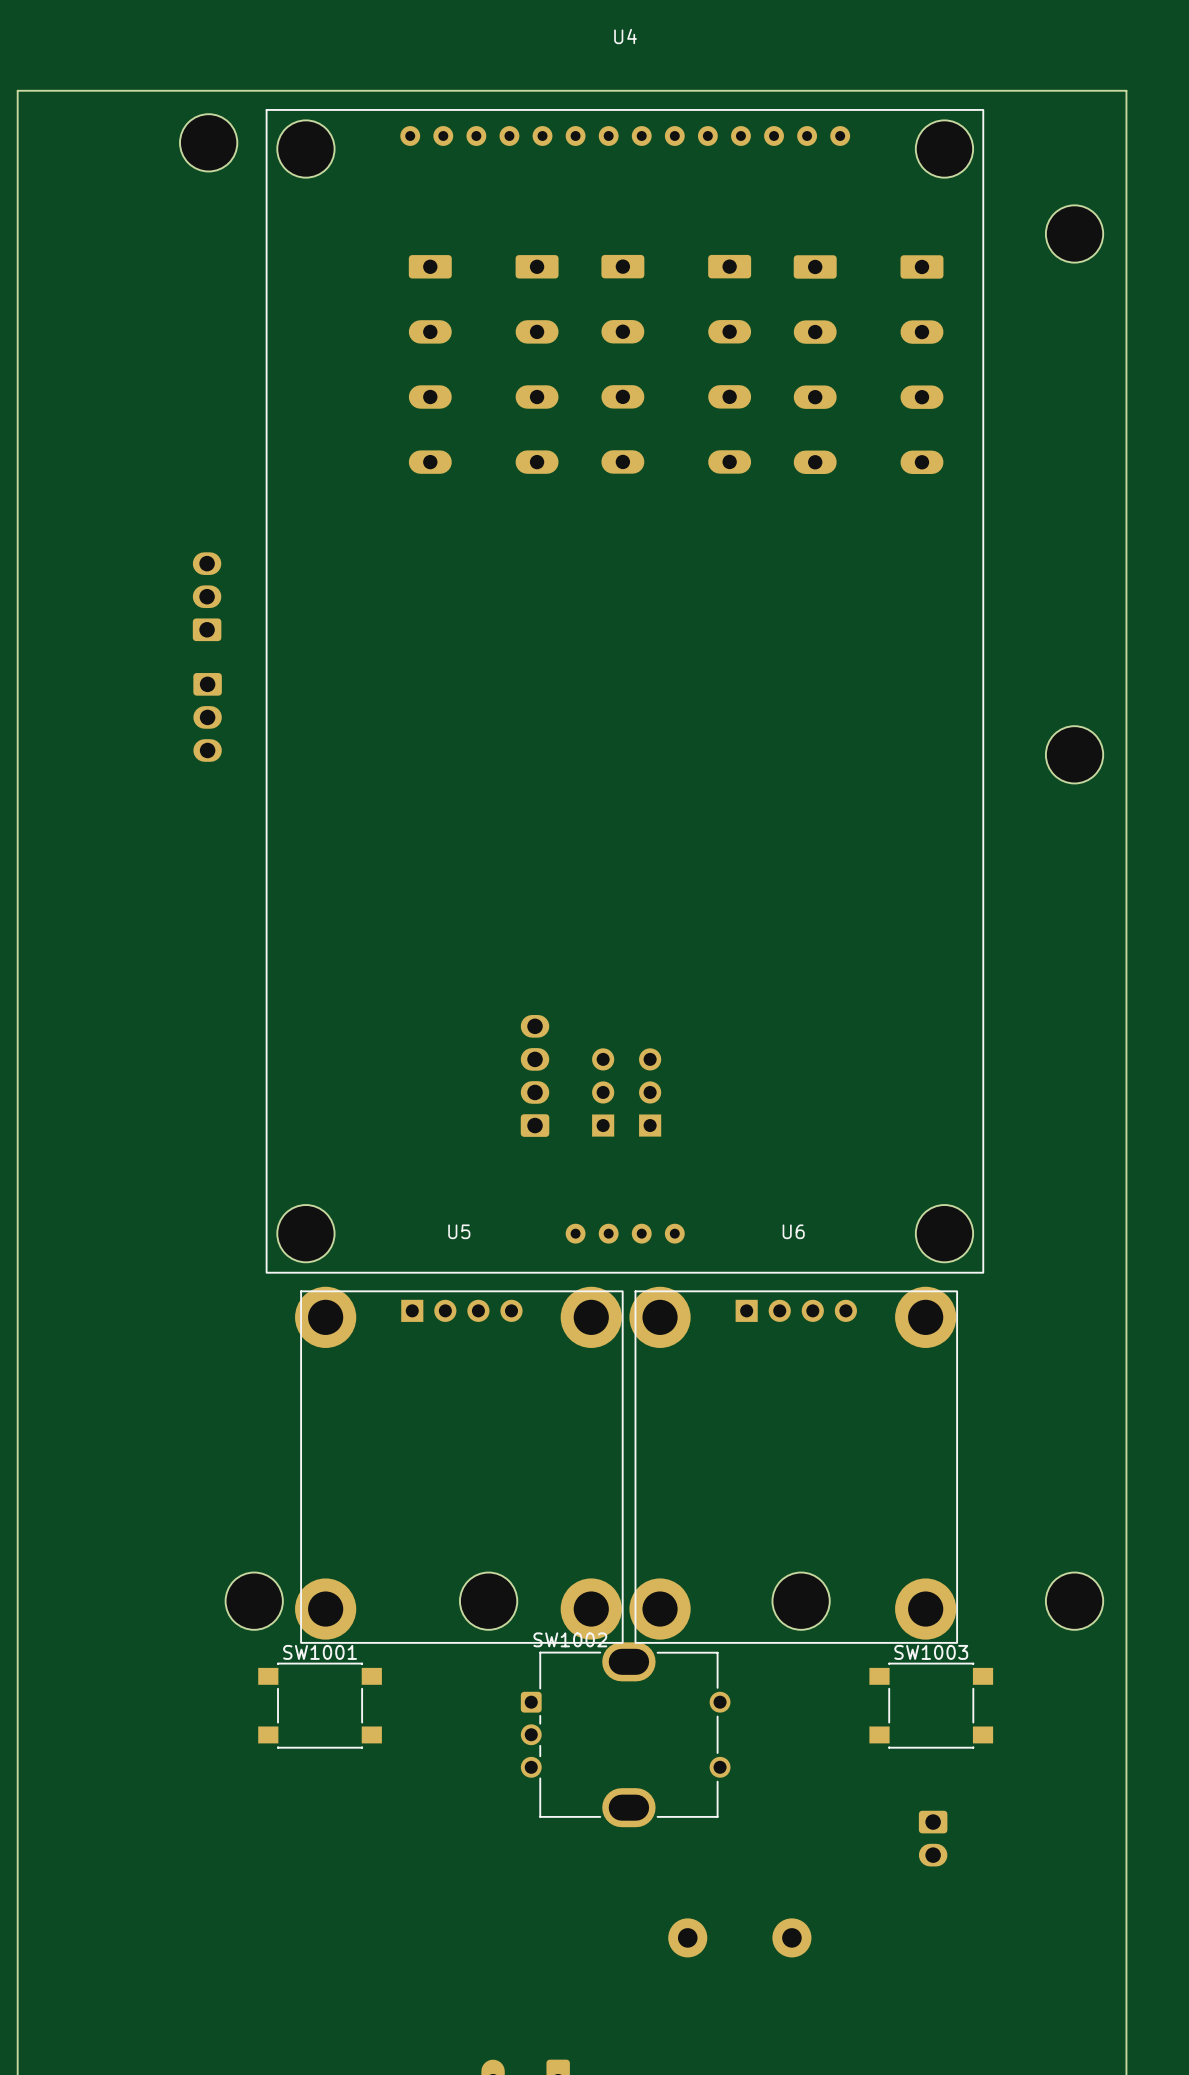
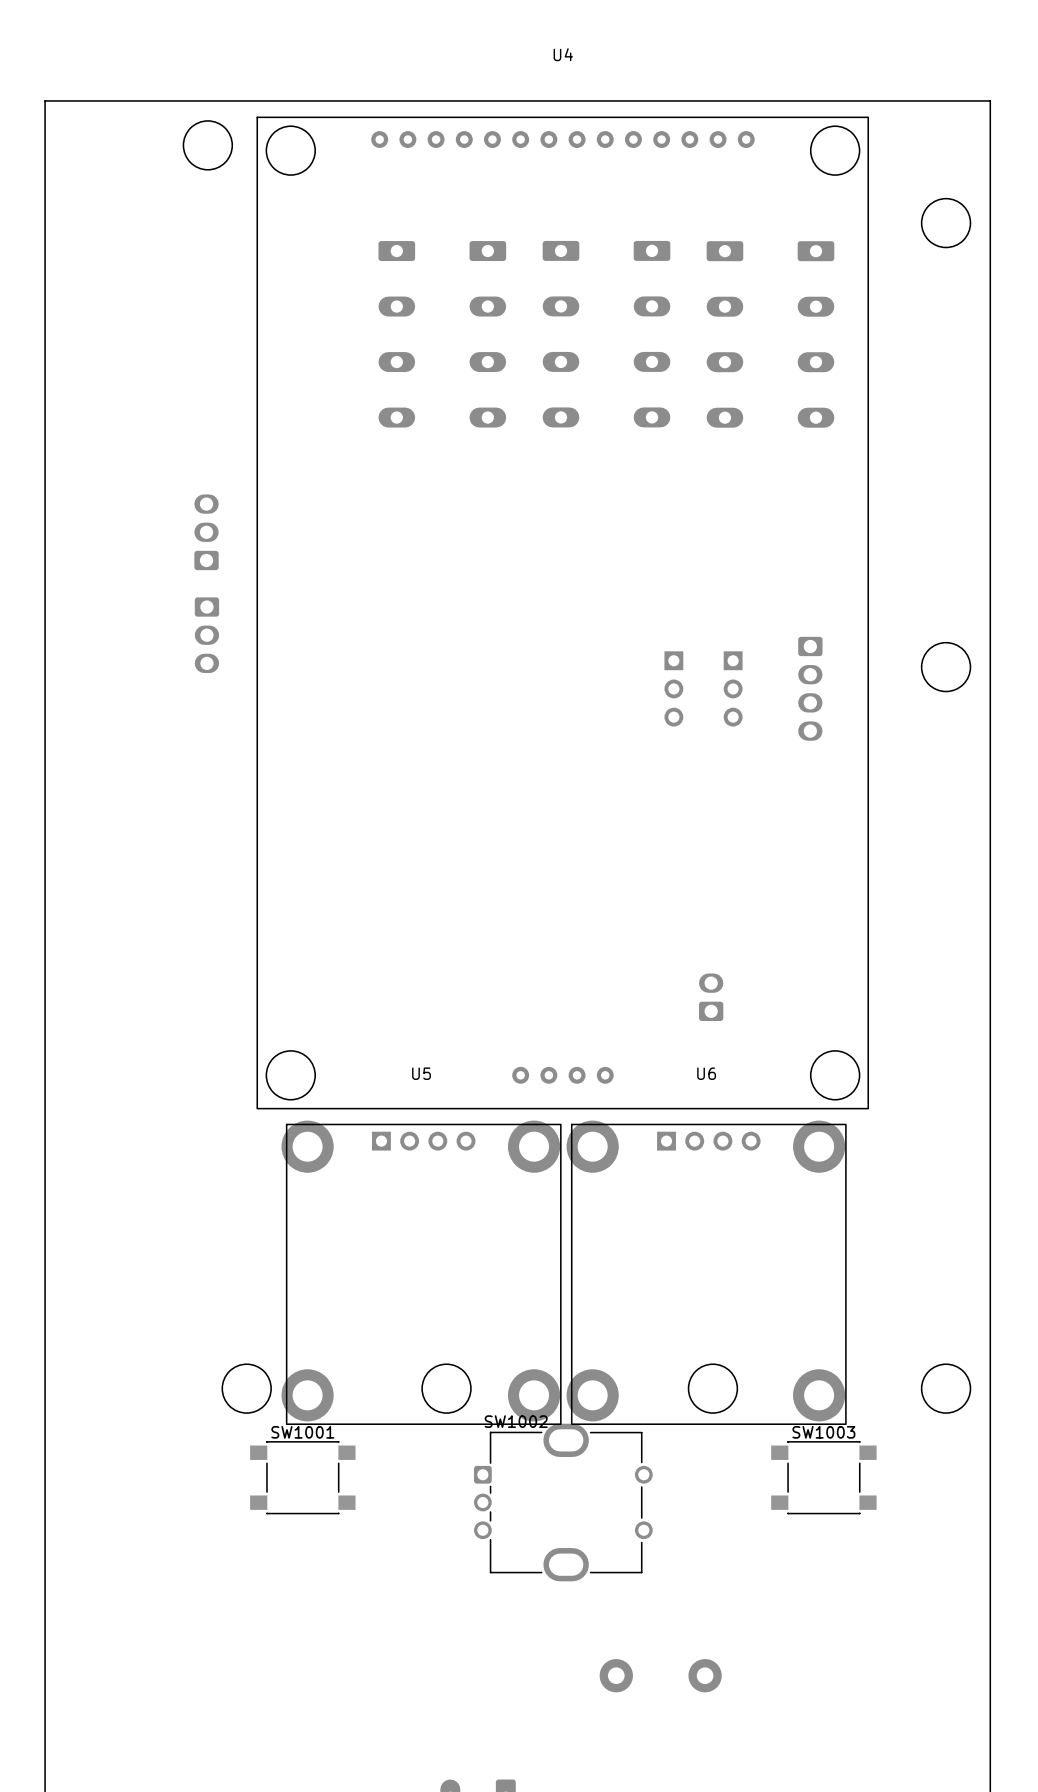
part: none -> (673, 688)
part: none -> (733, 688)
part: none -> (810, 688)
part: (535, 1075) -> none
part: (603, 1092) -> none
part: (650, 1092) -> none
part: none -> (711, 997)
part: (933, 1838) -> none

